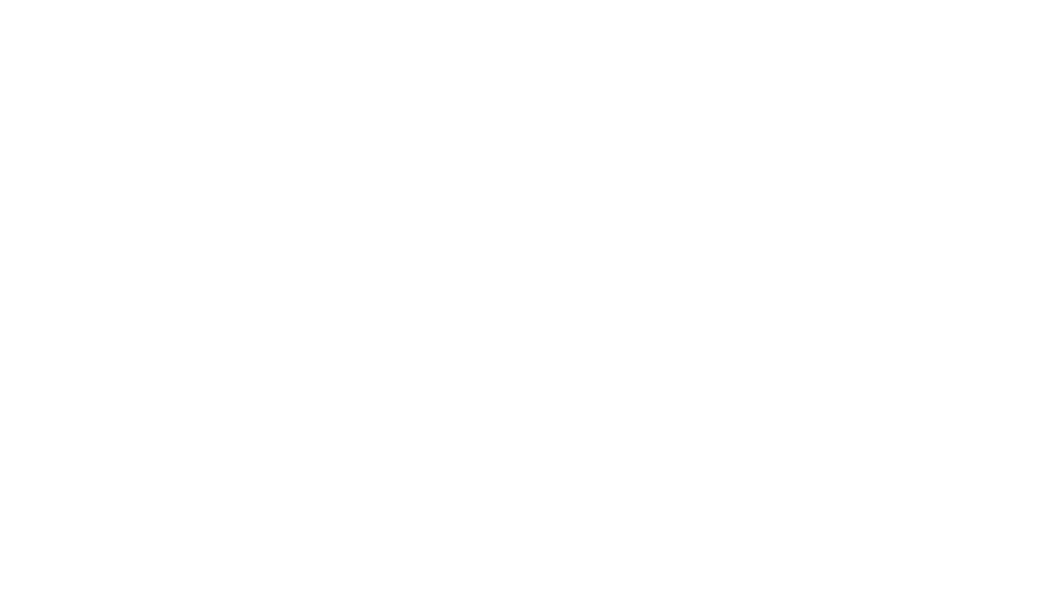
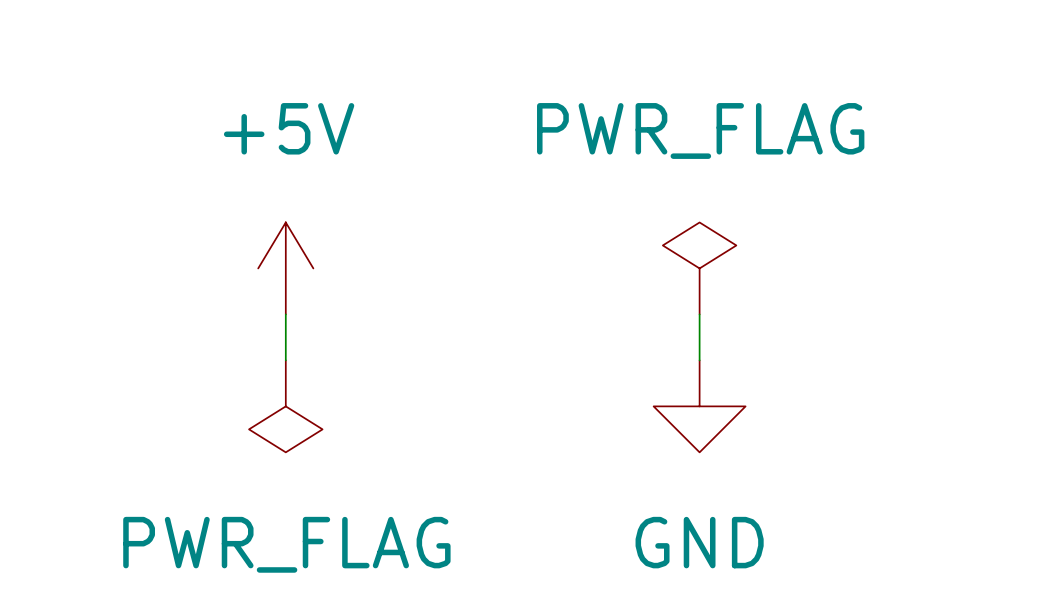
power symbol: none -> +5V (285, 268)
power symbol: none -> PWR_FLAG (699, 268)
wire: none -> (285, 314) (285, 360)
wire: none -> (699, 314) (699, 360)
power symbol: none -> PWR_FLAG (285, 406)
power symbol: none -> GND (699, 406)

